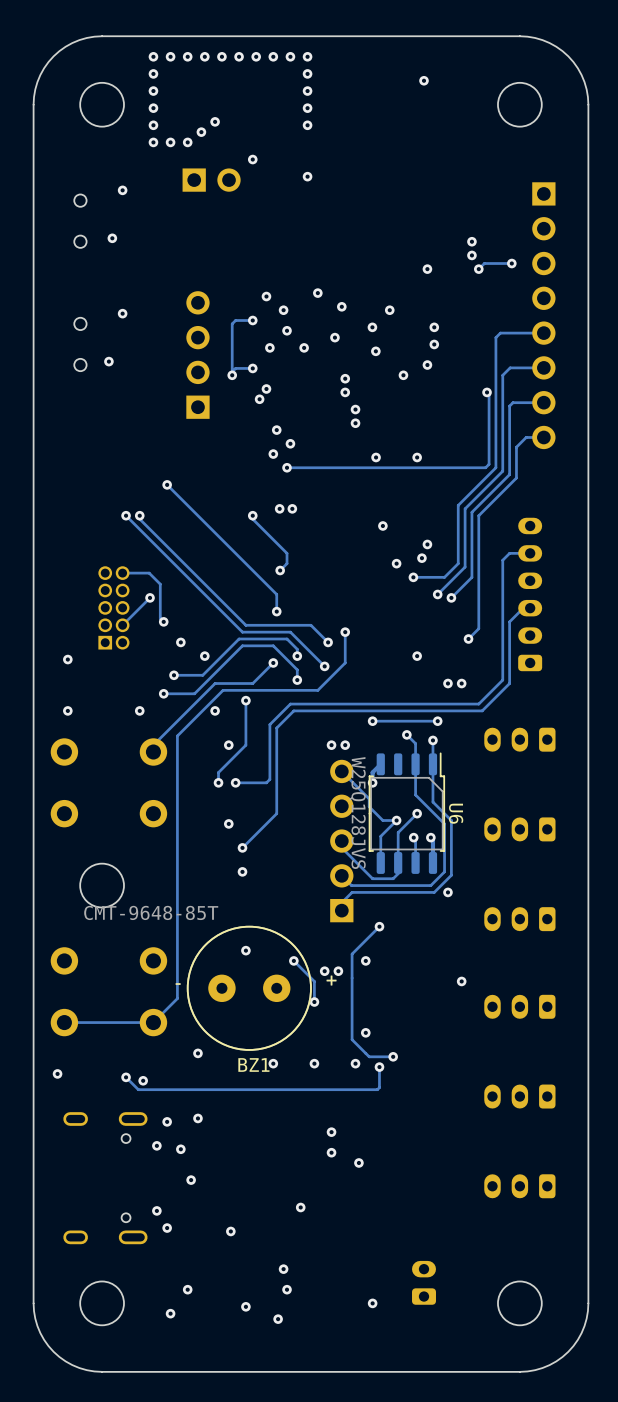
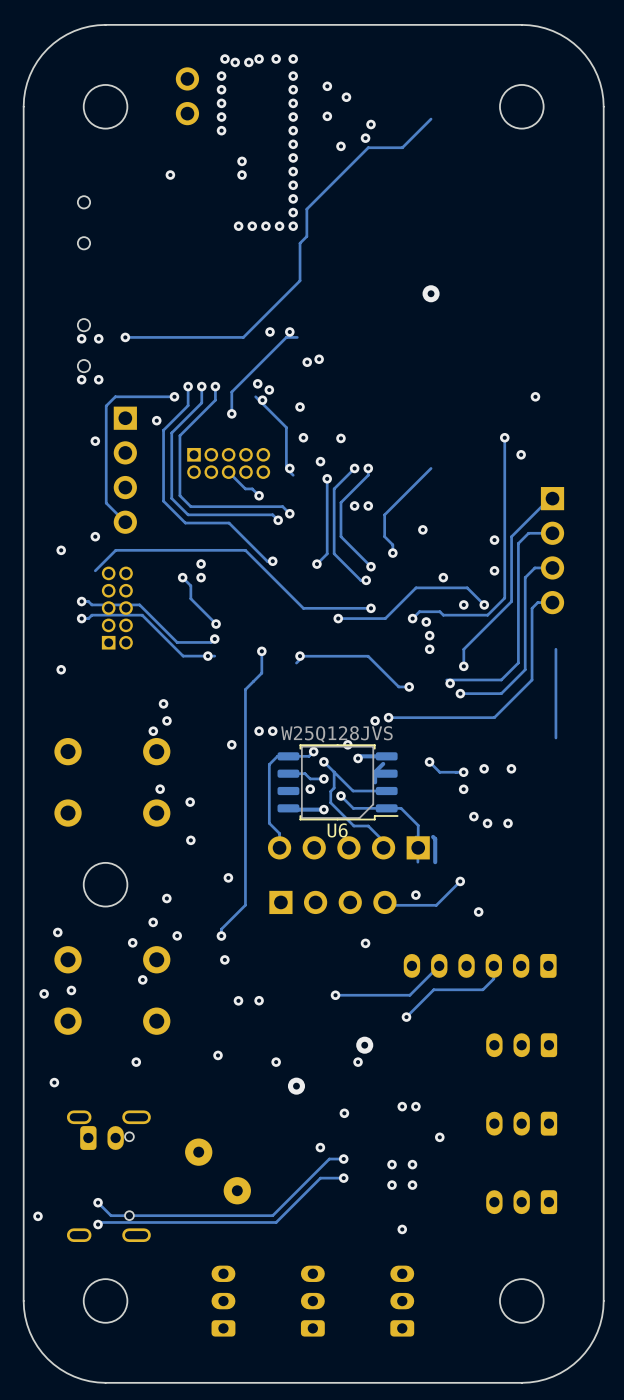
board edge: (519, 36) (94, 36) (79, 40) (59, 51) (44, 68) (37, 82) (33, 104) (33, 1303) (35, 1318) (44, 1339) (59, 1356) (79, 1368) (102, 1371) (527, 1371) (549, 1365) (562, 1356) (577, 1339) (584, 1326) (588, 1303) (588, 104) (584, 82) (577, 68) (568, 56) (549, 43) (535, 37) (519, 36) -> (521, 24) (545, 28) (560, 34) (573, 43) (585, 54) (594, 68) (600, 83) (603, 98) (603, 1300) (600, 1324) (589, 1346) (573, 1364) (553, 1376) (529, 1382) (105, 1382) (81, 1379) (66, 1373) (53, 1364) (37, 1346) (27, 1324) (23, 1300) (23, 106) (27, 83) (37, 61) (53, 43) (74, 31) (97, 25) (521, 24)
via: (153, 56) -> none
via: (170, 56) -> none
via: (187, 56) -> none
via: (204, 56) -> none
via: (239, 56) -> none
via: (307, 56) -> none
via: none -> (235, 62)
via: none -> (248, 62)
via: (153, 73) -> none
via: none -> (221, 76)
via: none -> (293, 76)
via: (307, 73) -> none
via: (424, 80) -> none
via: none -> (327, 86)
via: none -> (221, 89)
via: none -> (293, 89)
via: (153, 91) -> none
via: (307, 91) -> none
part: none -> (187, 96)
via: none -> (346, 97)
via: none -> (221, 103)
via: none -> (293, 103)
via: (153, 108) -> none
via: (307, 108) -> none
via: none -> (327, 116)
via: none -> (221, 117)
via: none -> (293, 117)
track: none -> (431, 119) (402, 147) (368, 147) (306, 209) (306, 236) (300, 243) (300, 280) (243, 337) (125, 337)
via: (215, 121) -> none
via: none -> (371, 124)
via: (153, 125) -> none
via: (307, 125) -> none
via: none -> (221, 130)
via: none -> (293, 130)
via: (201, 132) -> none
via: none -> (365, 138)
via: (153, 142) -> none
via: (170, 142) -> none
via: (187, 142) -> none
via: none -> (293, 144)
via: none -> (340, 146)
via: none -> (293, 157)
via: none -> (242, 161)
via: (252, 159) -> none
via: none -> (293, 171)
via: none -> (170, 175)
via: none -> (242, 175)
via: (307, 176) -> none
part: (211, 180) -> none
via: none -> (293, 185)
via: (122, 190) -> none
via: none -> (293, 198)
via: none -> (293, 212)
via: none -> (238, 226)
via: none -> (252, 226)
via: none -> (265, 226)
via: none -> (279, 226)
via: none -> (293, 226)
via: (112, 238) -> none
via: (471, 241) -> none
via: (471, 255) -> none
track: (511, 263) (484, 263) (478, 269) -> none
via: (511, 263) -> none
via: (427, 269) -> none
via: (478, 269) -> none
via: none -> (431, 293)
via: (317, 293) -> none
via: (266, 296) -> none
via: (341, 306) -> none
via: (283, 310) -> none
via: (389, 310) -> none
via: (122, 313) -> none
part: (543, 315) -> none
track: (252, 320) (235, 320) (232, 323) (232, 375) -> none
via: (252, 320) -> none
via: (372, 327) -> none
via: (434, 327) -> none
via: none -> (270, 331)
track: (543, 333) (500, 333) (495, 337) (495, 467) (458, 505) (458, 563) (444, 577) (413, 577) -> none
via: none -> (125, 337)
track: none -> (297, 337) (286, 337) (231, 392) (231, 413)
via: none -> (81, 338)
via: none -> (98, 338)
via: (334, 337) -> none
via: (434, 344) -> none
via: (269, 347) -> none
via: (304, 347) -> none
via: (375, 351) -> none
part rotation: 0° (197, 355) -> 180° (125, 470)
part position: (197, 355) -> (125, 470)
via: none -> (319, 359)
via: (108, 361) -> none
via: none -> (307, 362)
via: (427, 365) -> none
track: (543, 367) (510, 367) (502, 375) (502, 436) -> none
track: (252, 368) (235, 368) (232, 371) -> none
via: (252, 368) -> none
via: (232, 375) -> none
via: (403, 375) -> none
via: none -> (81, 379)
via: none -> (98, 379)
via: (345, 378) -> none
via: none -> (257, 383)
track: none -> (188, 386) (188, 405) (163, 430) (163, 501) (185, 523) (229, 523) (267, 561) (272, 561)
via: none -> (188, 386)
track: none -> (201, 386) (201, 402) (171, 432) (171, 498) (188, 514) (272, 514) (278, 520)
via: none -> (201, 386)
track: none -> (215, 386) (215, 400) (179, 435) (179, 495) (190, 506) (282, 506) (289, 513)
via: none -> (215, 386)
via: (345, 392) -> none
track: (487, 392) (489, 394) (489, 464) (485, 467) (287, 467) -> none
via: (487, 392) -> none
track: none -> (174, 396) (115, 396) (106, 405) (106, 503) (125, 522)
via: none -> (174, 396)
track: none -> (255, 396) (286, 427) (286, 468) (293, 475)
via: none -> (535, 396)
track: (543, 402) (513, 402) (509, 406) (509, 474) (471, 512) (471, 577) (451, 597) -> none
via: none -> (300, 407)
via: (355, 409) -> none
via: none -> (231, 413)
via: none -> (156, 420)
via: (355, 423) -> none
via: (276, 430) -> none
via: none -> (303, 437)
via: none -> (504, 437)
via: none -> (340, 438)
track: (543, 437) (526, 437) (516, 447) (516, 478) (478, 515) (478, 628) (468, 638) -> none
via: none -> (95, 441)
via: (290, 443) -> none
via: (273, 454) -> none
via: none -> (521, 454)
via: (376, 457) -> none
via: (417, 457) -> none
via: none -> (320, 461)
part: none -> (228, 463)
track: none -> (354, 468) (334, 488) (334, 553) (360, 580) (366, 580)
via: none -> (354, 468)
track: none -> (368, 468) (368, 475) (340, 502) (340, 536) (371, 566)
via: none -> (368, 468)
track: none -> (431, 468) (384, 514) (384, 536) (392, 544) (392, 553)
track: none -> (228, 472) (245, 488) (252, 488) (259, 495)
track: (502, 471) (465, 508) (465, 567) (437, 594) -> (504, 471) (504, 560)
track: none -> (327, 478) (327, 553) (316, 564)
via: none -> (327, 478)
track: (167, 484) (276, 594) (276, 611) -> none
via: (167, 484) -> none
via: none -> (259, 495)
track: none -> (552, 498) (549, 498) (511, 536) (511, 601) (463, 649) (463, 666)
via: none -> (354, 505)
via: none -> (368, 505)
via: (279, 508) -> none
via: (292, 508) -> none
via: none -> (289, 513)
track: (126, 515) (242, 632) (290, 632) (324, 666) -> none
via: (126, 515) -> none
track: (139, 515) (139, 519) (245, 625) (310, 625) (328, 642) -> none
via: (139, 515) -> none
track: (252, 515) (252, 519) (287, 553) (287, 563) (280, 570) -> none
via: (252, 515) -> none
via: none -> (278, 520)
via: (382, 525) -> none
via: none -> (422, 529)
track: none -> (552, 533) (528, 533) (518, 543) (518, 662) (501, 679) (446, 679)
via: none -> (95, 536)
via: none -> (494, 540)
via: (427, 544) -> none
via: none -> (61, 550)
part: none -> (552, 550)
track: (530, 553) (509, 553) (502, 560) -> none
via: (421, 558) -> none
via: none -> (201, 563)
via: none -> (316, 564)
via position: (396, 563) -> (392, 553)
via: none -> (371, 566)
track: none -> (95, 570) (115, 550) (245, 550) (303, 608) (371, 608)
via position: (280, 570) -> (272, 561)
via: none -> (494, 570)
track: (122, 573) (149, 573) (160, 584) (160, 618) (163, 621) -> none
track: none -> (182, 577) (190, 585) (190, 598) (216, 624)
via: none -> (182, 577)
via: none -> (201, 577)
via: (413, 577) -> none
via: none -> (443, 577)
via: none -> (366, 580)
via: (437, 594) -> none
part: (530, 594) -> none
track: (150, 597) (122, 625) -> none
via: (150, 597) -> none
via: (451, 597) -> none
track: (502, 597) (502, 680) (478, 704) (290, 704) (269, 724) (269, 779) (266, 782) (235, 782) -> (504, 598) (487, 615) (443, 615) (439, 611) (419, 611) (412, 618)
via: none -> (81, 601)
track: none -> (552, 602) (537, 602) (532, 608) (532, 679) (494, 717) (388, 717)
track: none -> (81, 604) (81, 601) (88, 601) (91, 604) (139, 604) (177, 642) (211, 642) (214, 639)
via: none -> (463, 604)
track: none -> (484, 604) (467, 587) (416, 587) (385, 618) (338, 618)
via: none -> (484, 604)
via: none -> (371, 608)
track: (530, 608) (523, 608) (509, 621) (509, 683) -> (552, 567) (534, 567) (525, 577) (525, 669) (511, 683)
via: (276, 611) -> none
track: none -> (81, 618) (88, 618) (91, 615) (142, 615) (183, 656) (214, 656)
via: none -> (81, 618)
via: none -> (338, 618)
via: none -> (412, 618)
via: (163, 621) -> none
via: none -> (426, 621)
via: none -> (216, 624)
track: (345, 632) (345, 662) (317, 690) (223, 690) (177, 735) (177, 998) (153, 1022) (64, 1022) -> none
via: (345, 632) -> none
via: none -> (429, 635)
via: none -> (214, 639)
via: (468, 638) -> none
via: (180, 642) -> none
via: (328, 642) -> none
via: none -> (429, 649)
track: none -> (555, 649) (555, 737)
track: none -> (261, 651) (261, 673) (245, 689) (245, 905) (221, 929) (221, 936)
track: (297, 656) (297, 649) (287, 638) (239, 638) (202, 675) (174, 675) -> none
via: (417, 656) -> none
via position: (67, 659) -> (61, 669)
track: (273, 662) (252, 683) (215, 683) (153, 745) (153, 752) -> none
via position: (273, 662) -> (261, 651)
track: none -> (296, 663) (303, 656) (368, 656) (398, 686) (409, 686)
via: (324, 666) -> none
via: none -> (463, 666)
via: (174, 675) -> none
track: (297, 680) (297, 669) (273, 645) (242, 645) (194, 693) (163, 693) -> none
via: (297, 680) -> none
via: (461, 683) -> none
via: none -> (409, 686)
via: (163, 693) -> none
via: none -> (460, 693)
track: (499, 693) (482, 710) (293, 710) (276, 728) (276, 813) (242, 847) -> (501, 693) (460, 693)
track: (245, 700) (245, 745) (218, 772) (218, 782) -> none
via: (245, 700) -> none
via: none -> (163, 703)
via: (67, 710) -> none
via: (139, 710) -> none
via: (215, 710) -> none
via: none -> (388, 717)
via: none -> (166, 720)
track: (437, 721) (372, 721) -> none
via: (437, 721) -> none
via: none -> (153, 731)
via: none -> (259, 731)
via: none -> (272, 731)
track: (406, 734) (415, 743) (415, 794) (444, 823) (444, 871) (430, 885) (351, 885) (341, 875) -> none
via: (406, 734) -> none
part: (519, 739) -> none
track: (432, 740) (432, 802) (451, 820) (451, 875) (434, 892) (352, 892) (341, 902) (341, 910) -> none
via: (432, 740) -> none
via: (331, 745) -> none
track: none -> (313, 751) (308, 756) (277, 756) (269, 764) (269, 823) (279, 833) (279, 847)
via: none -> (313, 751)
track: none -> (386, 756) (360, 756) (358, 758)
via: none -> (358, 758)
track: none -> (323, 761) (353, 791) (386, 791)
via: none -> (323, 761)
track: none -> (429, 762) (439, 772) (463, 772)
via: none -> (429, 762)
via: none -> (484, 768)
via: none -> (511, 768)
track: (341, 771) (369, 798) (369, 806) (382, 820) (396, 820) (380, 836) (380, 862) -> none
track: none -> (334, 772) (334, 788) (330, 791) (330, 802) (353, 826) (368, 826) (383, 841) (383, 847)
via: none -> (463, 772)
track: none -> (288, 773) (305, 773) (310, 778) (323, 778)
via: none -> (323, 778)
via: (218, 782) -> none
via: (235, 782) -> none
via: (372, 782) -> none
via: none -> (160, 789)
via: none -> (310, 789)
via: none -> (463, 789)
track: none -> (340, 795) (353, 808) (401, 808) (418, 825) (418, 847)
via: none -> (340, 795)
via: none -> (190, 802)
track: none -> (288, 808) (323, 809)
via: none -> (323, 809)
U6 rotation: 0° (406, 813) -> 90° clockwise (337, 782)
U6 position: (406, 813) -> (337, 782)
track: (417, 813) (398, 832) (398, 873) (393, 878) (372, 878) (341, 847) (341, 841) -> none
via: (417, 813) -> none
via: none -> (473, 816)
via: (396, 820) -> none
via: (228, 823) -> none
via: none -> (487, 823)
via: none -> (508, 823)
part: (519, 829) -> none
via: (413, 837) -> none
via: (430, 837) -> none
via: none -> (190, 840)
part rotation: 0° (341, 841) -> 90° counterclockwise (348, 847)
via: (242, 847) -> none
via: (242, 871) -> none
via: none -> (228, 877)
track: none -> (460, 881) (436, 905) (387, 905) (384, 902)
via position: (447, 892) -> (460, 881)
via: none -> (415, 895)
via: none -> (166, 898)
part: none -> (332, 902)
via: none -> (478, 912)
part: (519, 919) -> none
via: none -> (153, 922)
track: (379, 926) (352, 954) (352, 1039) (369, 1056) (393, 1056) -> none
via: (379, 926) -> none
via: none -> (57, 932)
via: none -> (177, 935)
via: none -> (221, 936)
via: none -> (132, 942)
via: none -> (365, 943)
via: (245, 950) -> none
track: (293, 960) (314, 981) (314, 1002) -> none
via: (293, 960) -> none
via: (365, 960) -> none
via: none -> (224, 959)
track: none -> (439, 965) (409, 995) (335, 995)
part: none -> (480, 965)
track: none -> (493, 965) (493, 978) (482, 989) (433, 989) (406, 1017)
via: (324, 971) -> none
via: (338, 971) -> none
via: none -> (142, 979)
via: (461, 981) -> none
BZ1 side: bottom (249, 988) -> top (218, 1171)
via: none -> (71, 990)
via: none -> (44, 993)
via: none -> (335, 995)
via: none -> (238, 1000)
via: none -> (259, 1000)
via: (314, 1002) -> none
part: (519, 1006) -> none
via: none -> (406, 1017)
via: (365, 1032) -> none
via: none -> (364, 1045)
part: none -> (521, 1045)
via position: (197, 1053) -> (218, 1055)
via: (393, 1056) -> none
via: none -> (136, 1062)
via: (314, 1063) -> none
track: (379, 1067) (379, 1087) (377, 1089) (138, 1089) (126, 1077) -> none
via: (379, 1067) -> none
via position: (57, 1073) -> (54, 1082)
via: (126, 1077) -> none
via: (143, 1080) -> none
via: none -> (296, 1086)
part: (519, 1096) -> none
via: none -> (402, 1106)
via: none -> (415, 1106)
via: none -> (344, 1113)
via: (197, 1118) -> none
via: (167, 1121) -> none
part: none -> (521, 1123)
via: (331, 1132) -> none
part: none -> (102, 1138)
via: none -> (439, 1137)
via: (156, 1145) -> none
via: (180, 1149) -> none
via: none -> (320, 1147)
via position: (331, 1152) -> (343, 1159)
track: none -> (343, 1159) (329, 1159) (272, 1215) (111, 1215) (98, 1202)
via: (358, 1162) -> none
via: none -> (392, 1164)
via: none -> (412, 1164)
via: (191, 1180) -> none
track: none -> (343, 1178) (320, 1178) (276, 1222) (100, 1222) (98, 1224)
via: none -> (343, 1178)
part position: (519, 1186) -> (521, 1202)
via: none -> (392, 1185)
via: none -> (412, 1185)
via: none -> (98, 1202)
via: (300, 1207) -> none
via: (156, 1210) -> none
via: none -> (38, 1216)
via: none -> (98, 1224)
via: (167, 1228) -> none
via: (230, 1231) -> none
via: none -> (402, 1229)
via: (283, 1269) -> none
part: (424, 1282) -> none
via: (187, 1289) -> none
via: (287, 1289) -> none
part: none -> (223, 1301)
part: none -> (312, 1301)
via: (372, 1303) -> none
part: none -> (402, 1301)
via: (245, 1306) -> none
via: (170, 1313) -> none
via: (278, 1319) -> none

